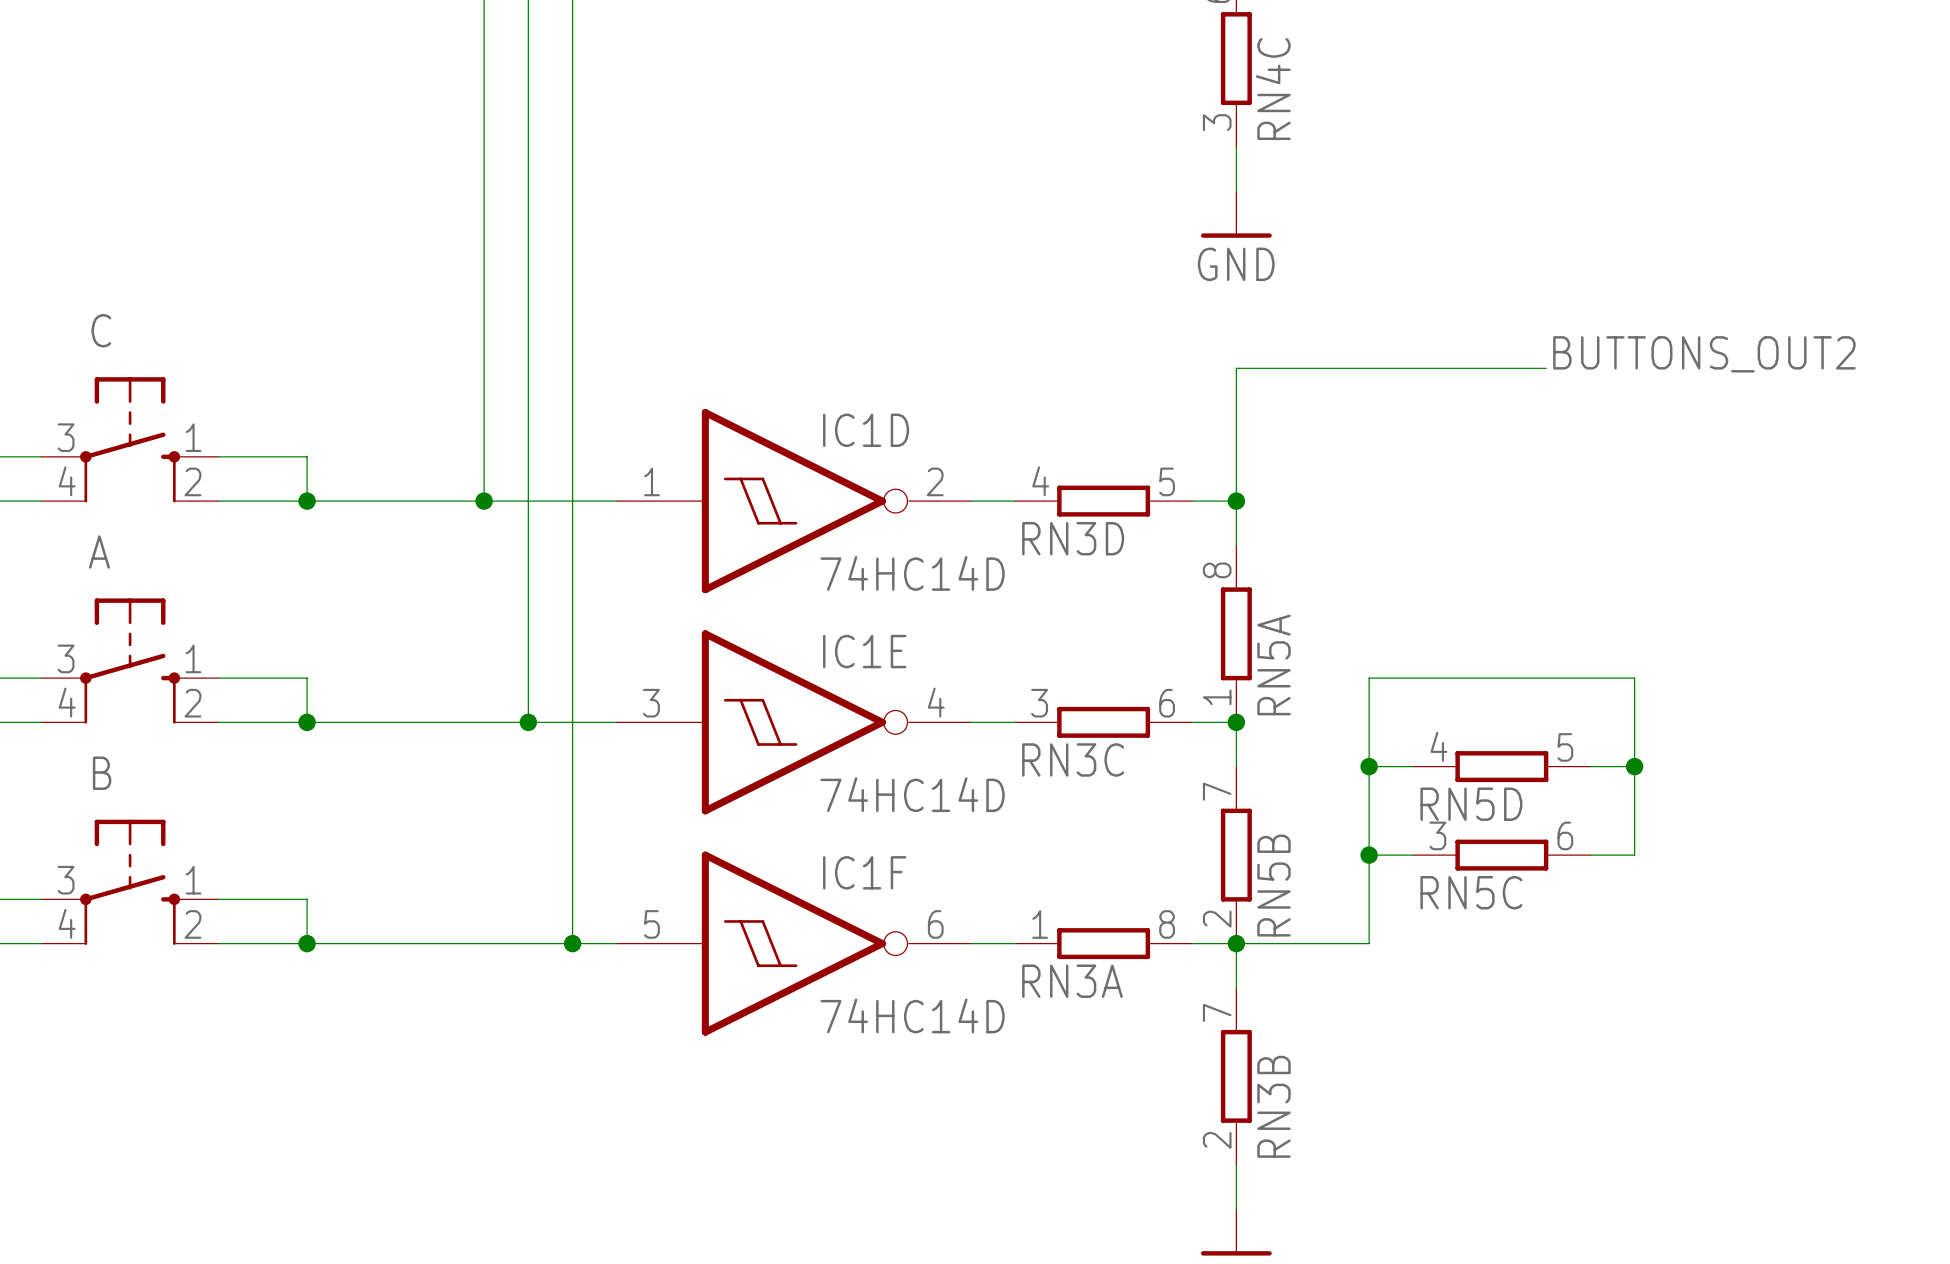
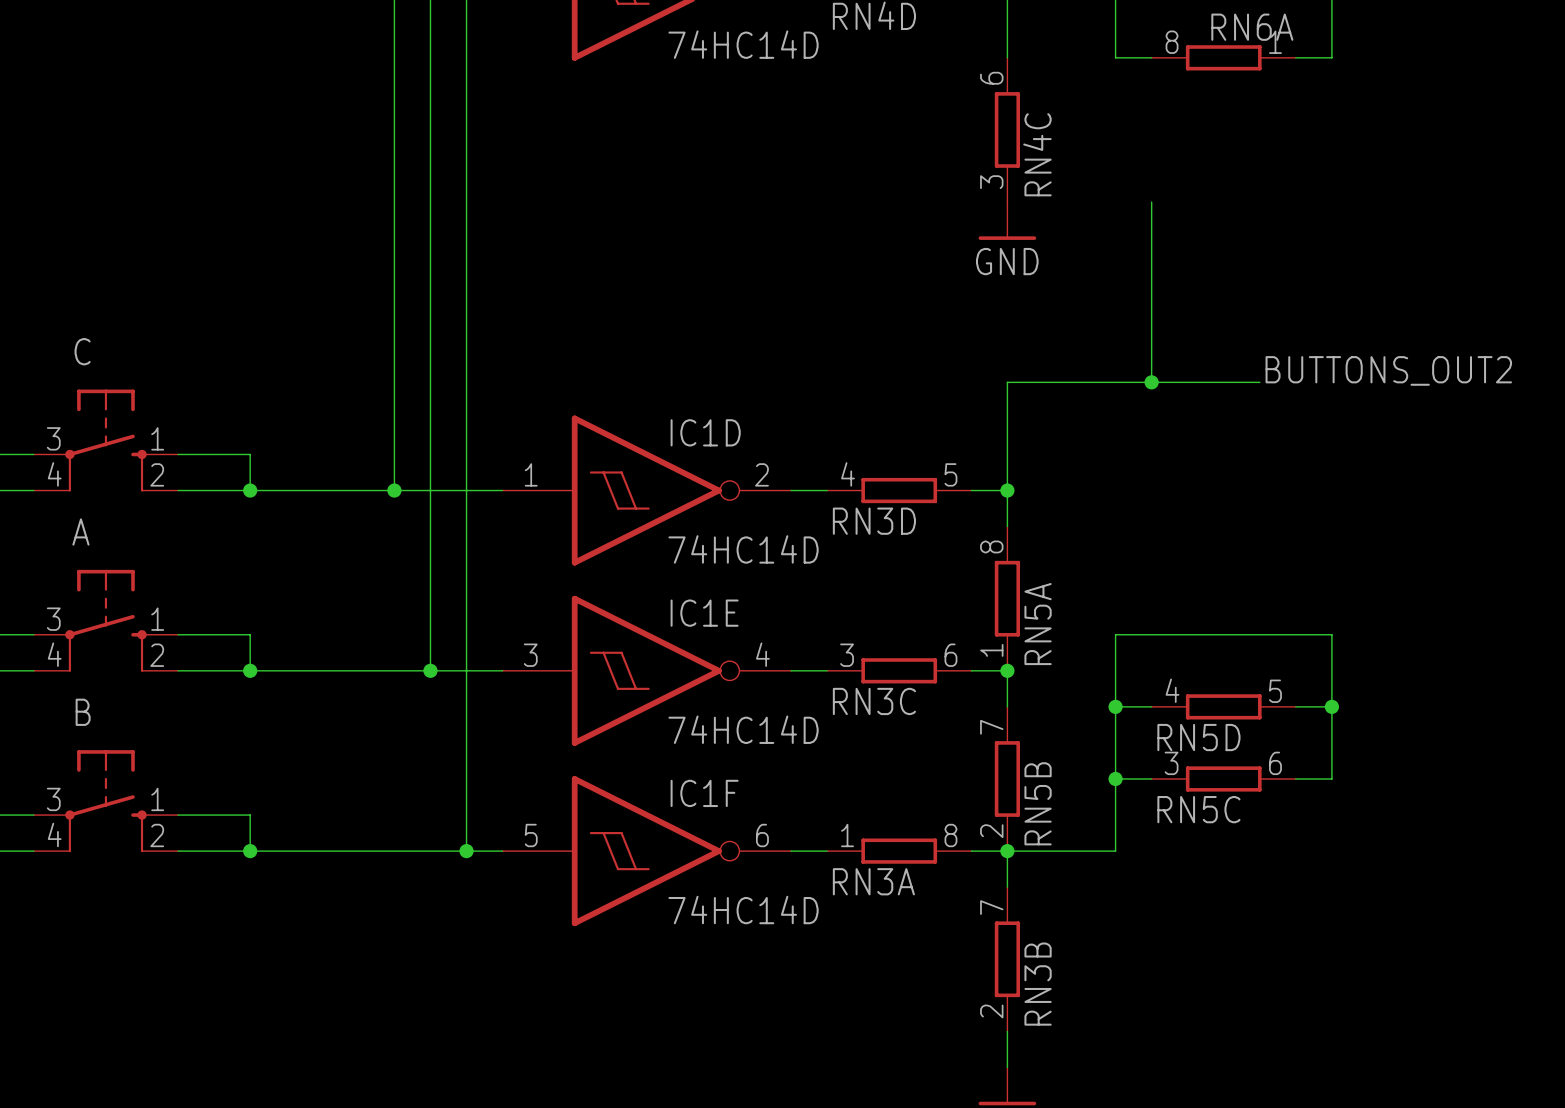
wire: none -> (1151, 202) (1151, 382)
power symbol position: GND (1236, 214) -> GND (1007, 221)
junction: none -> (1151, 382)

